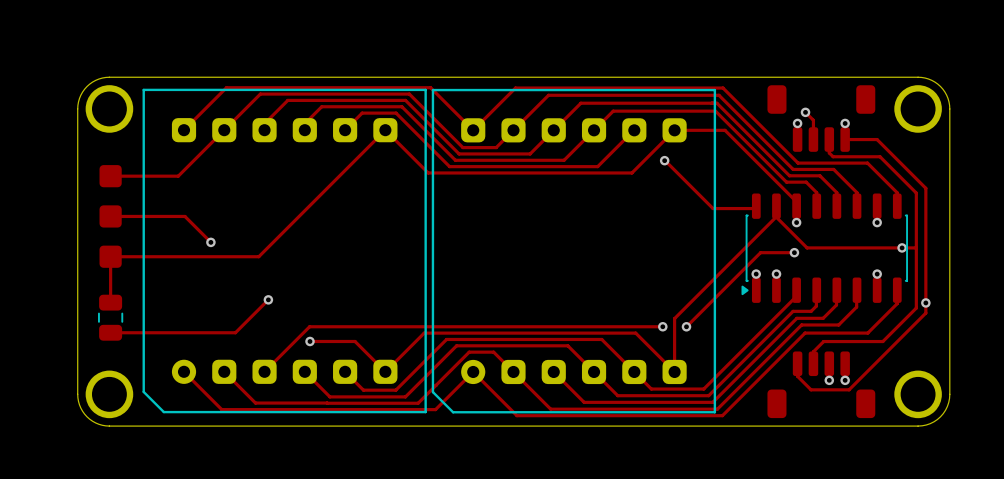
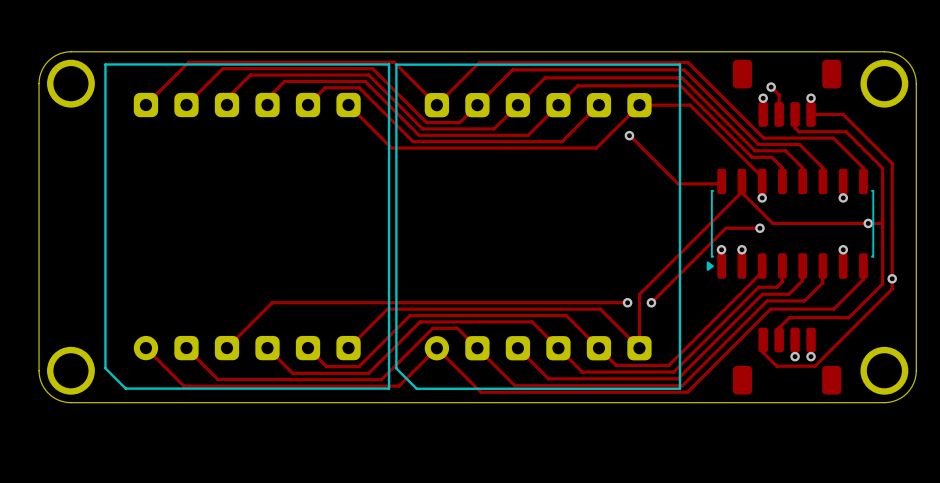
track: (224, 130) (178, 176) (110, 176) -> none
track: (385, 130) (258, 256) (110, 256) (110, 302) -> none
track: (110, 216) (184, 216) (210, 242) -> none
part: (110, 216) -> none
via: (210, 242) -> none
track: (268, 299) (235, 332) (110, 332) -> none
via: (268, 299) -> none
part: (110, 317) -> none
track: (310, 341) (355, 341) (385, 371) -> none
via: (310, 341) -> none

